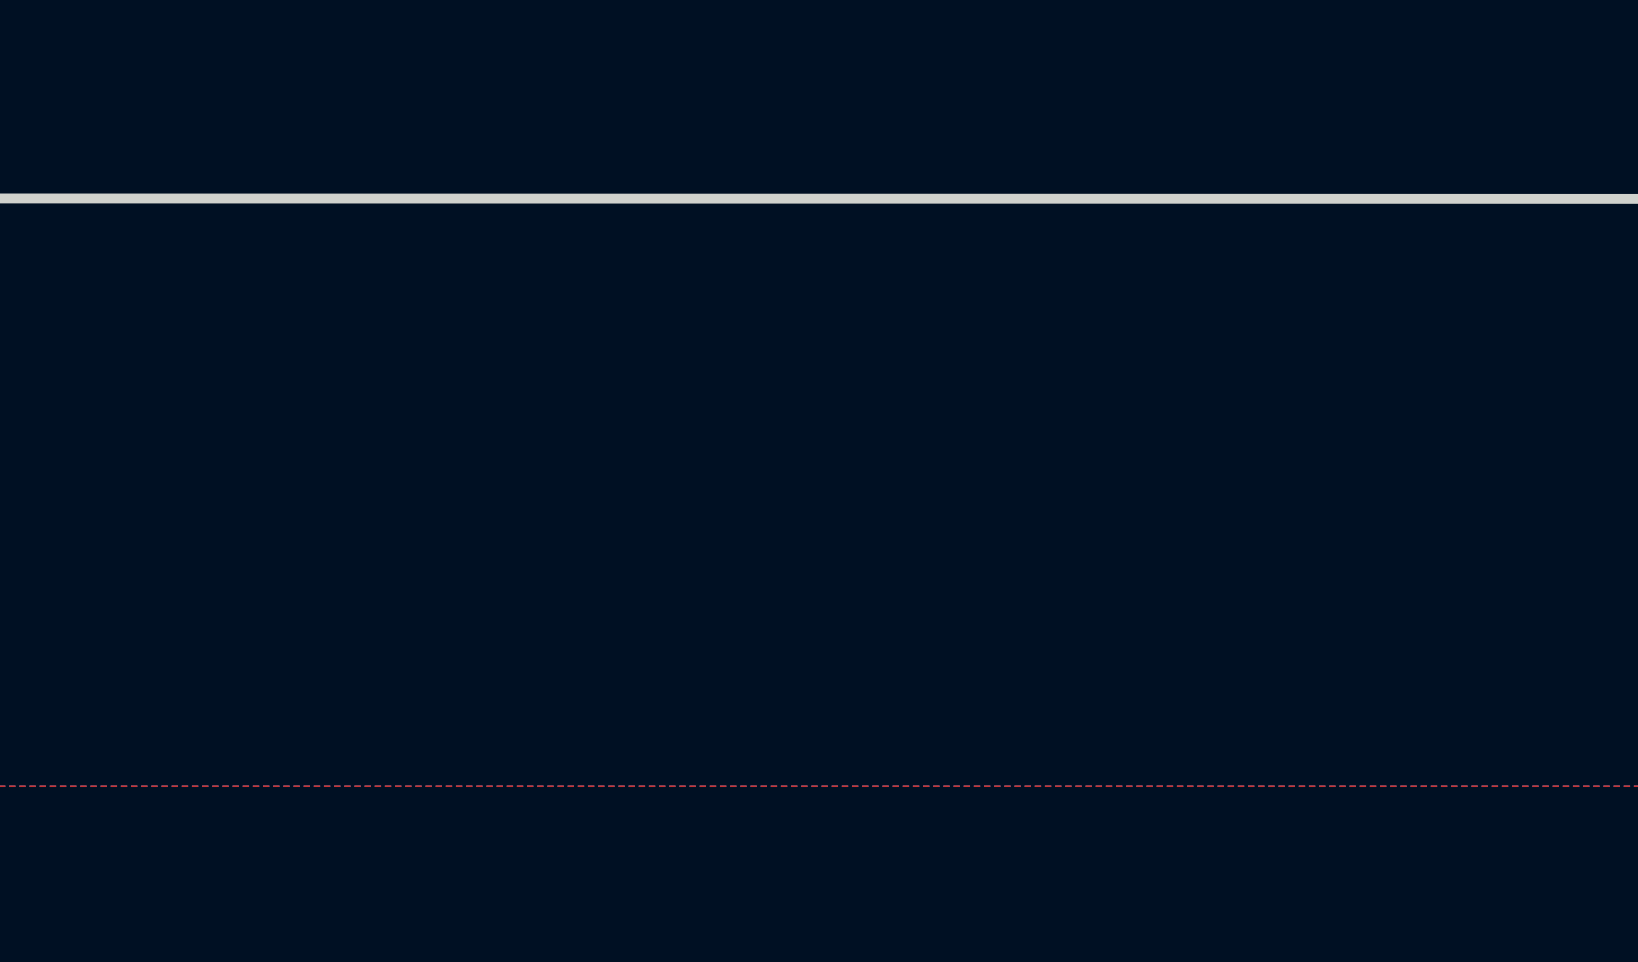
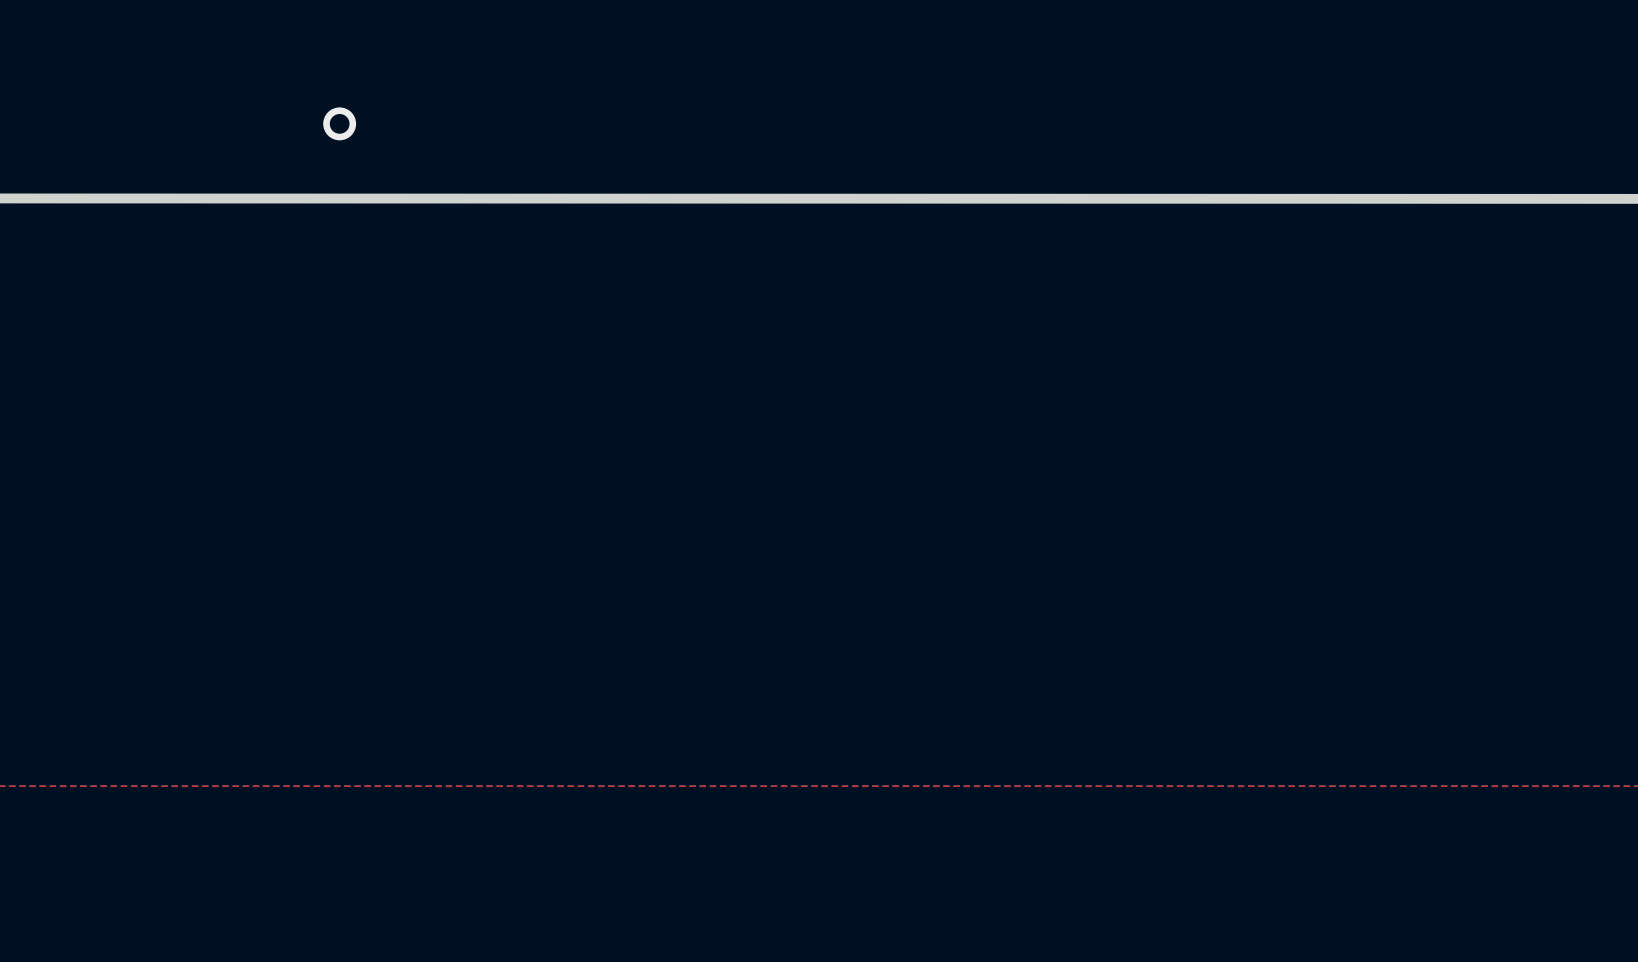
via: none -> (339, 123)

